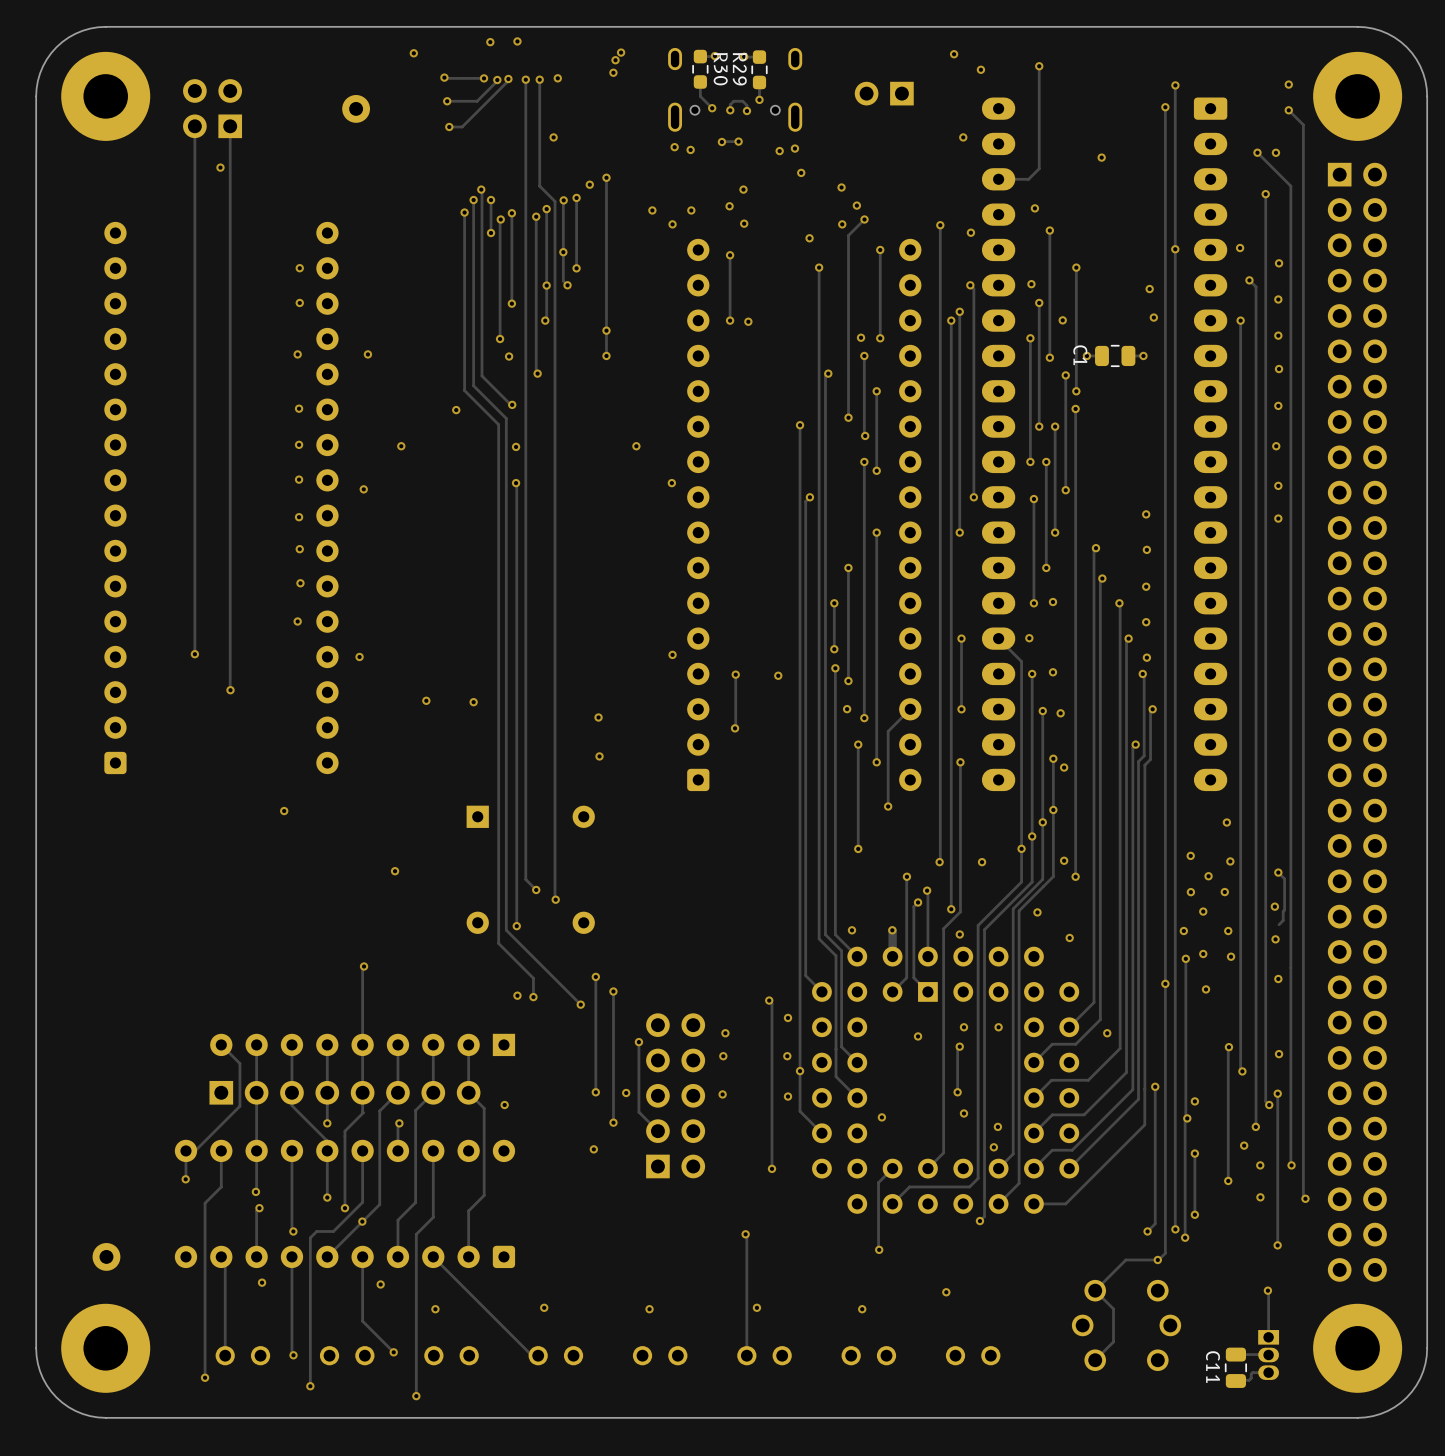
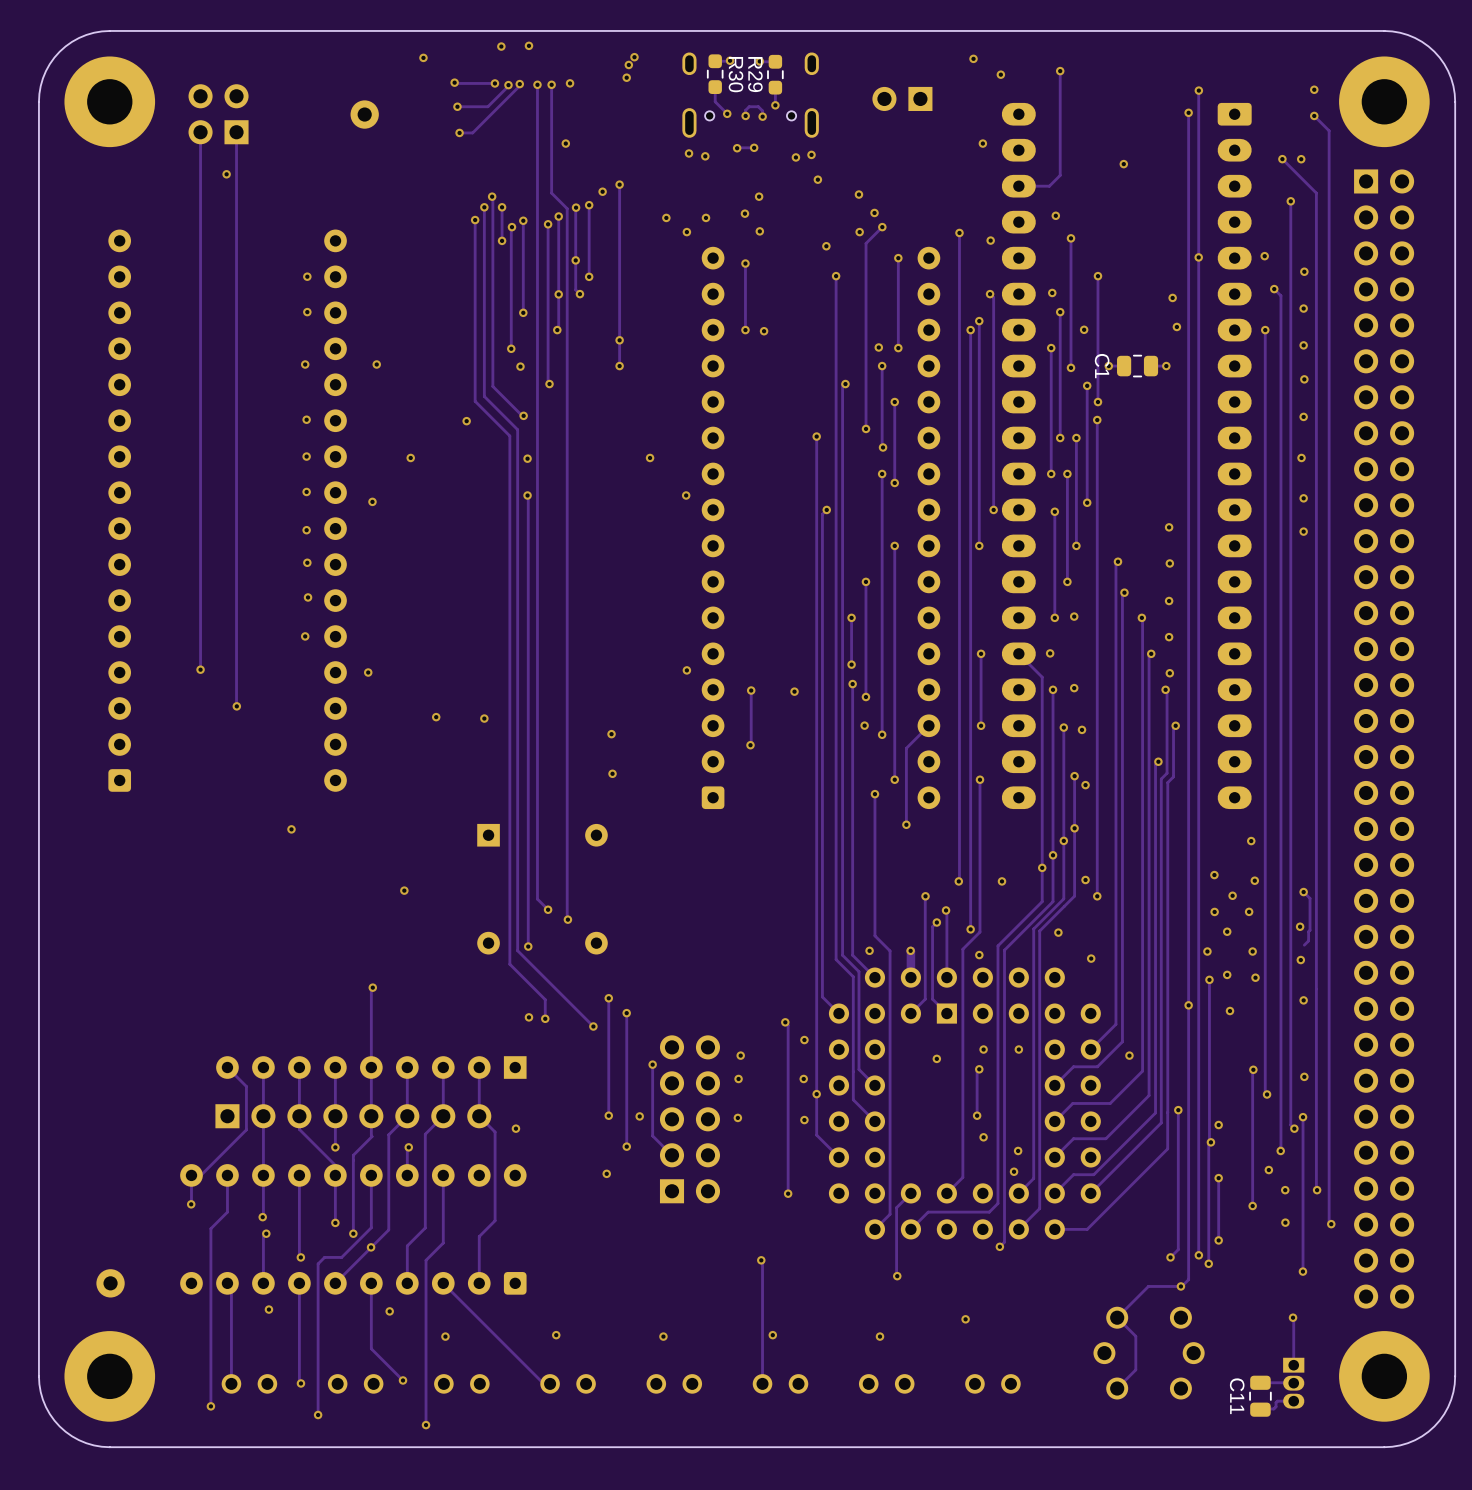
track: (858, 744) (858, 848) -> none
via position: (858, 744) -> (874, 794)
track: none -> (874, 794) (874, 935) (890, 950) (890, 1214) (874, 1229)
via: (858, 848) -> none
via: (881, 1117) -> none

